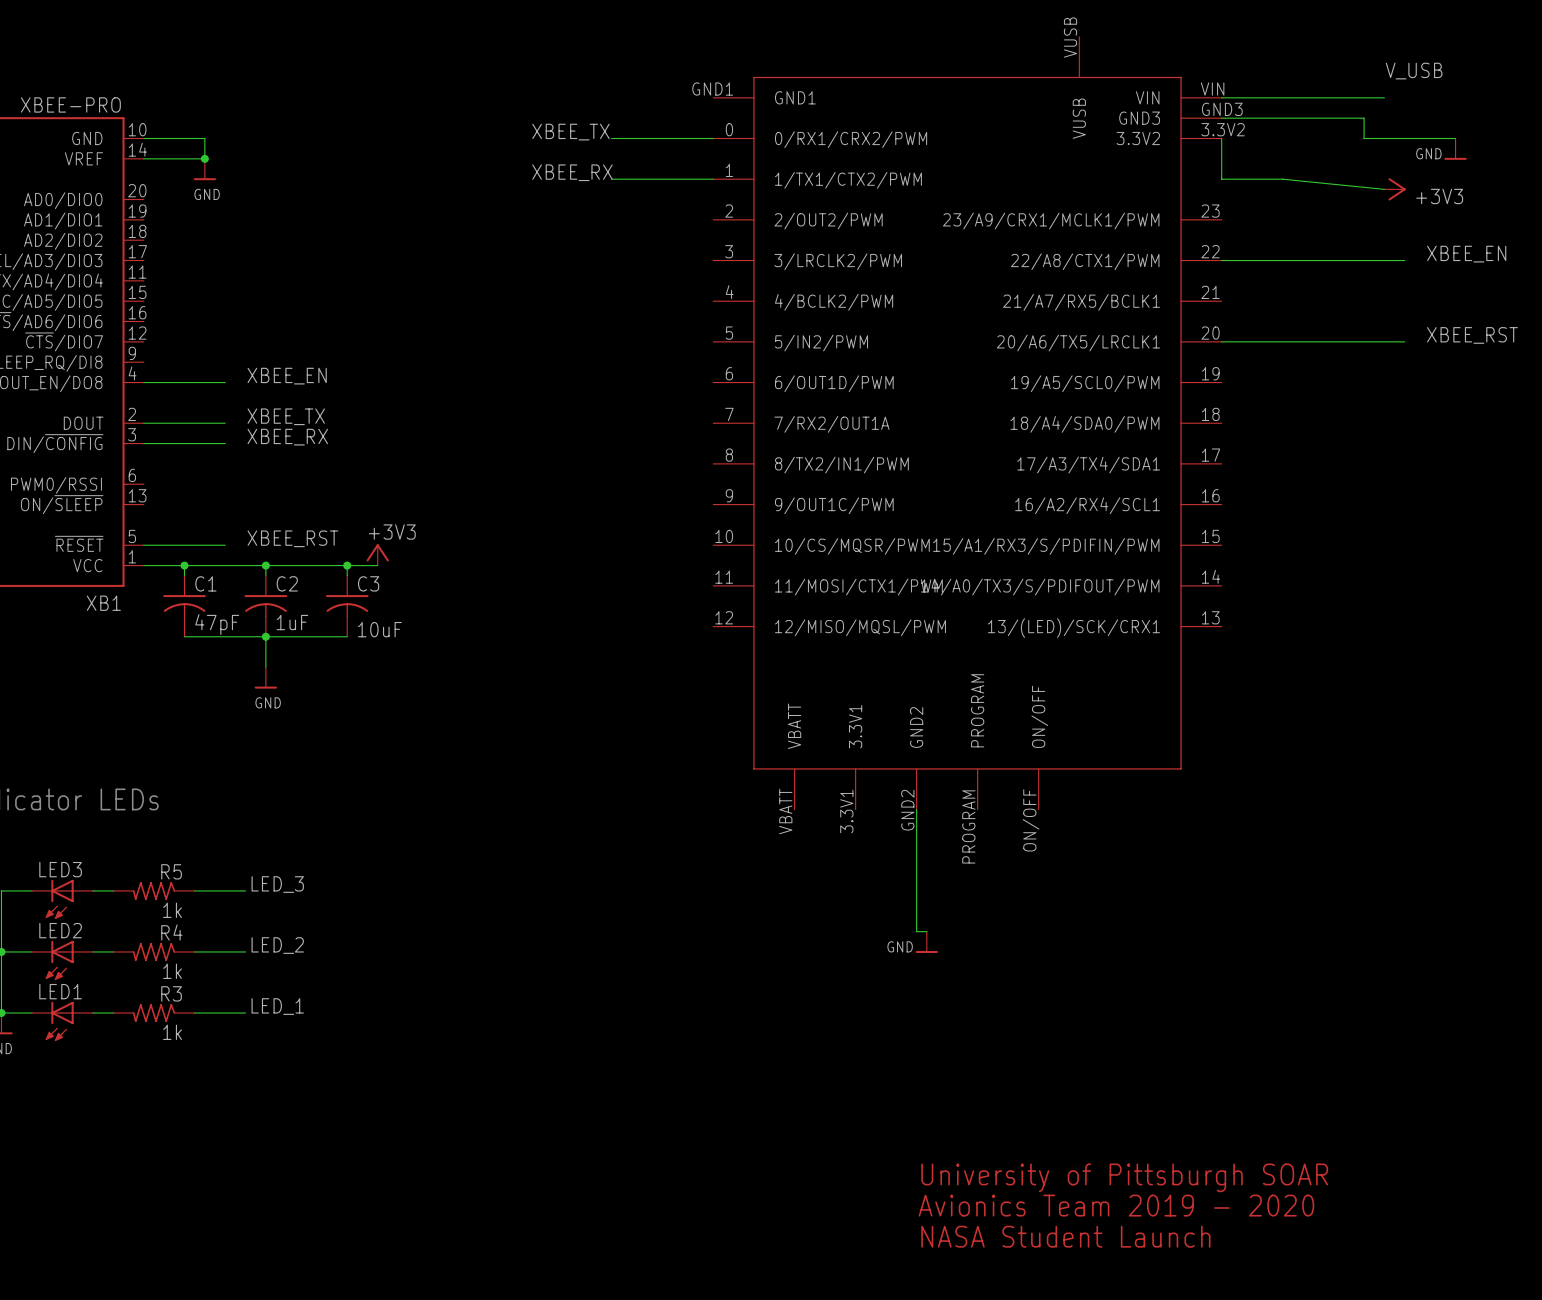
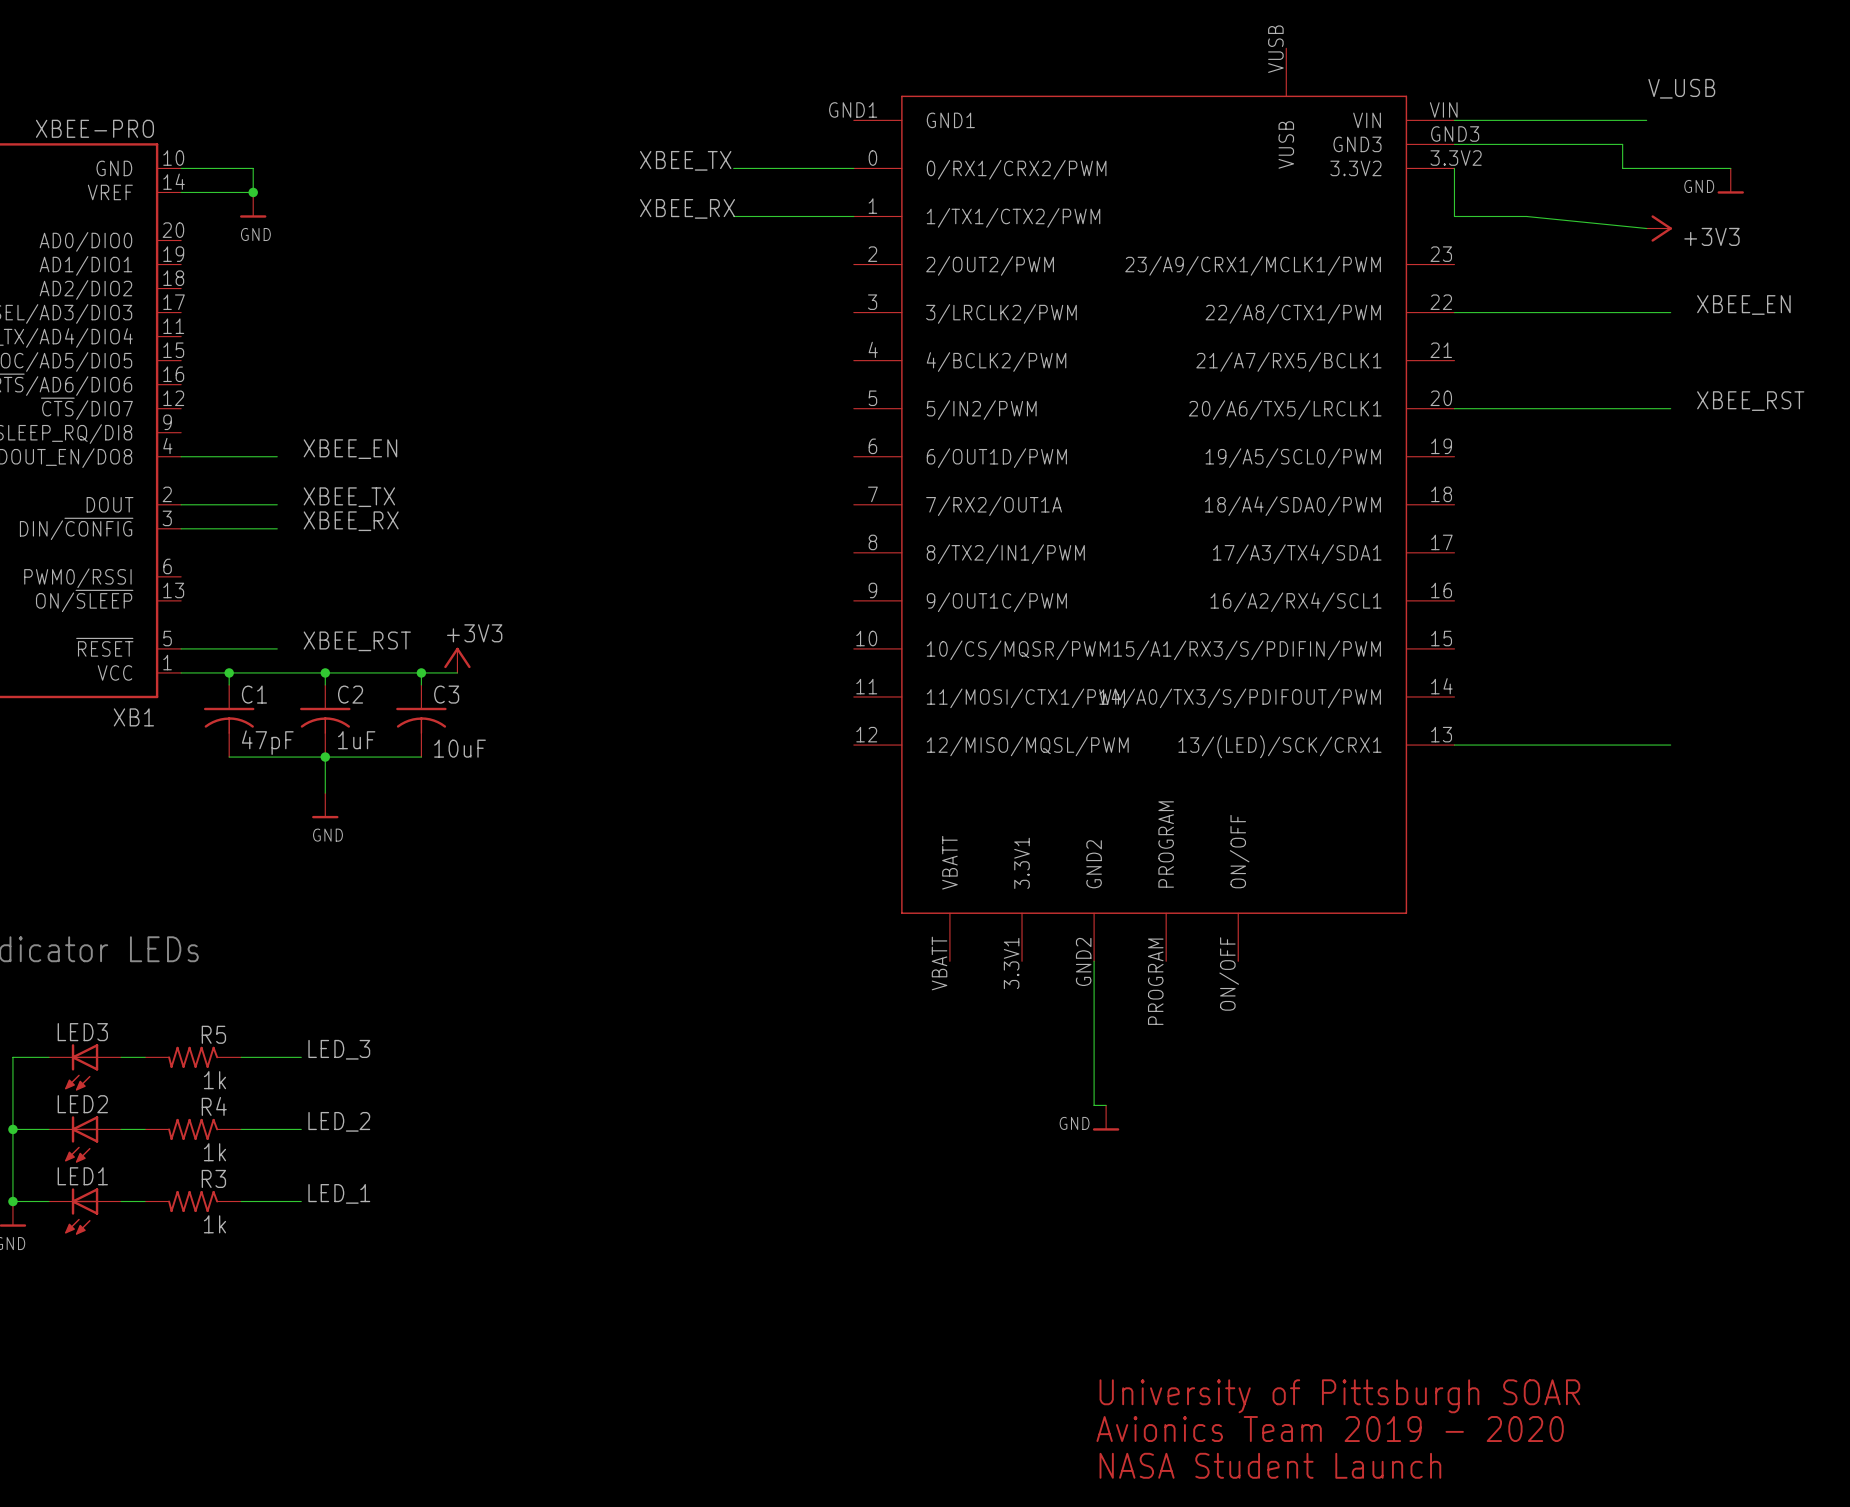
wire: none -> (1454, 745) (1670, 745)

